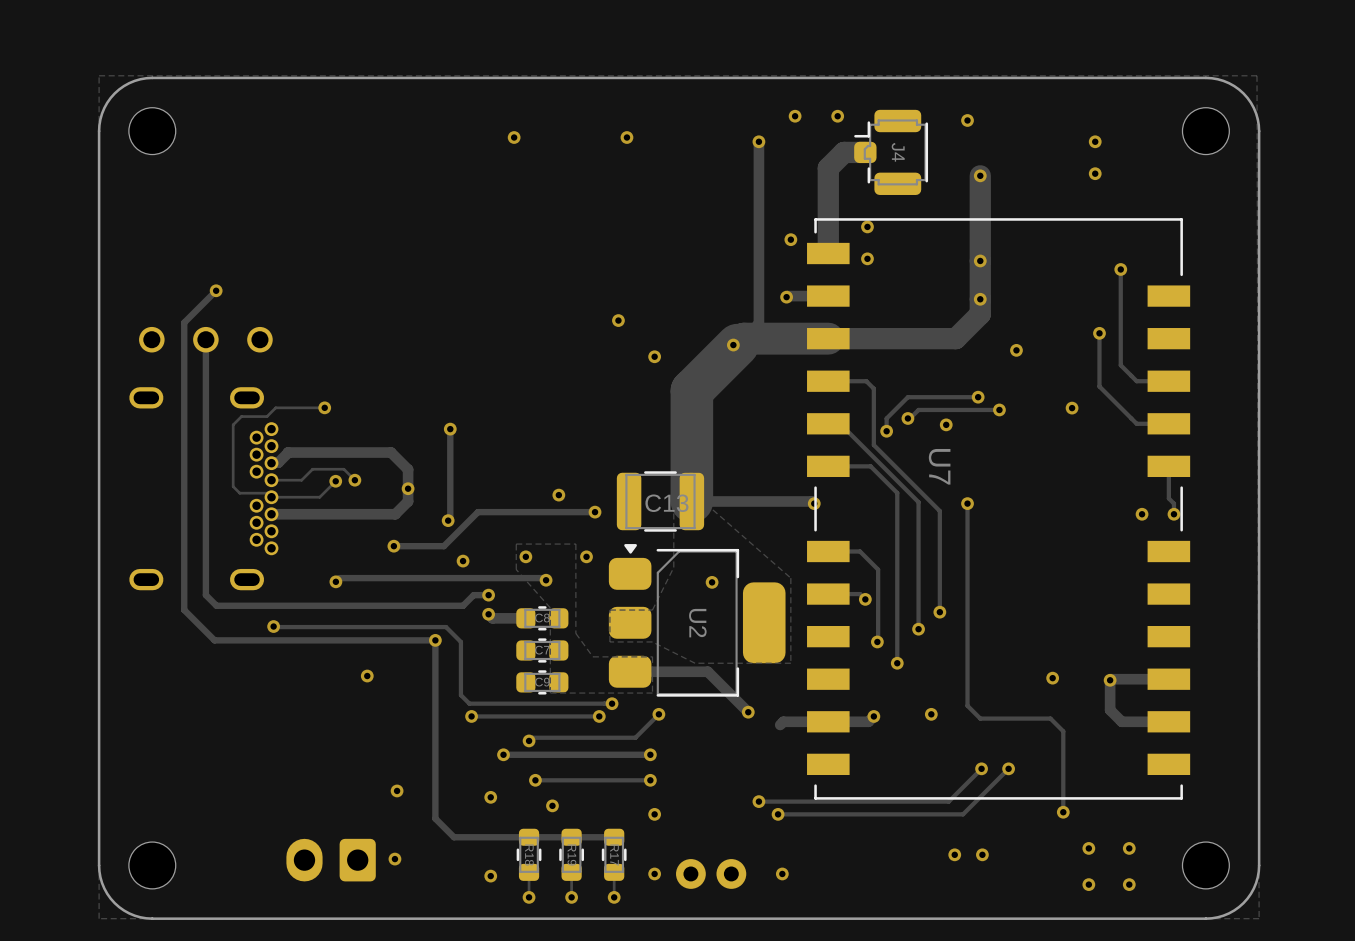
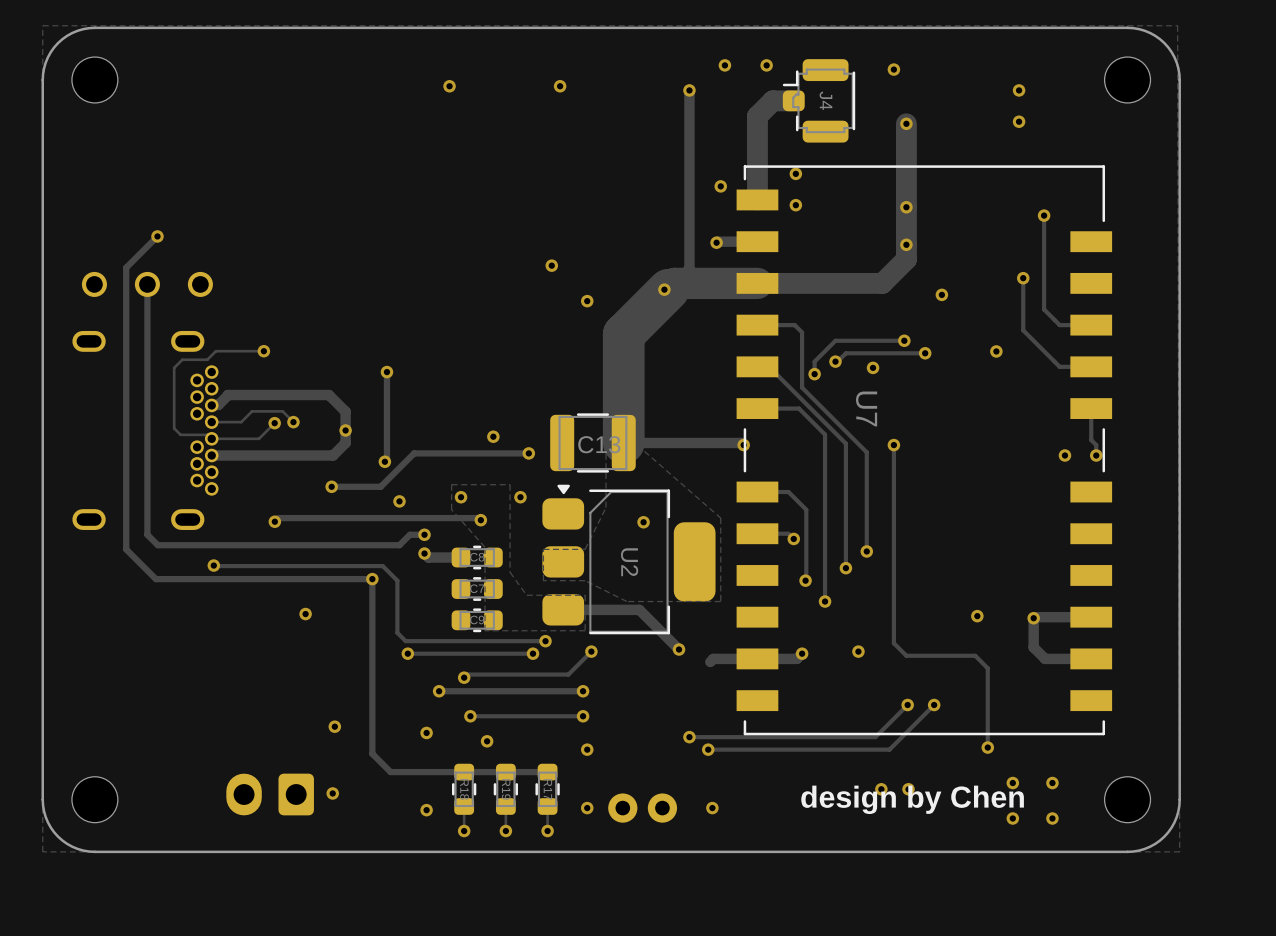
text: none -> design by Chen (912, 799)

